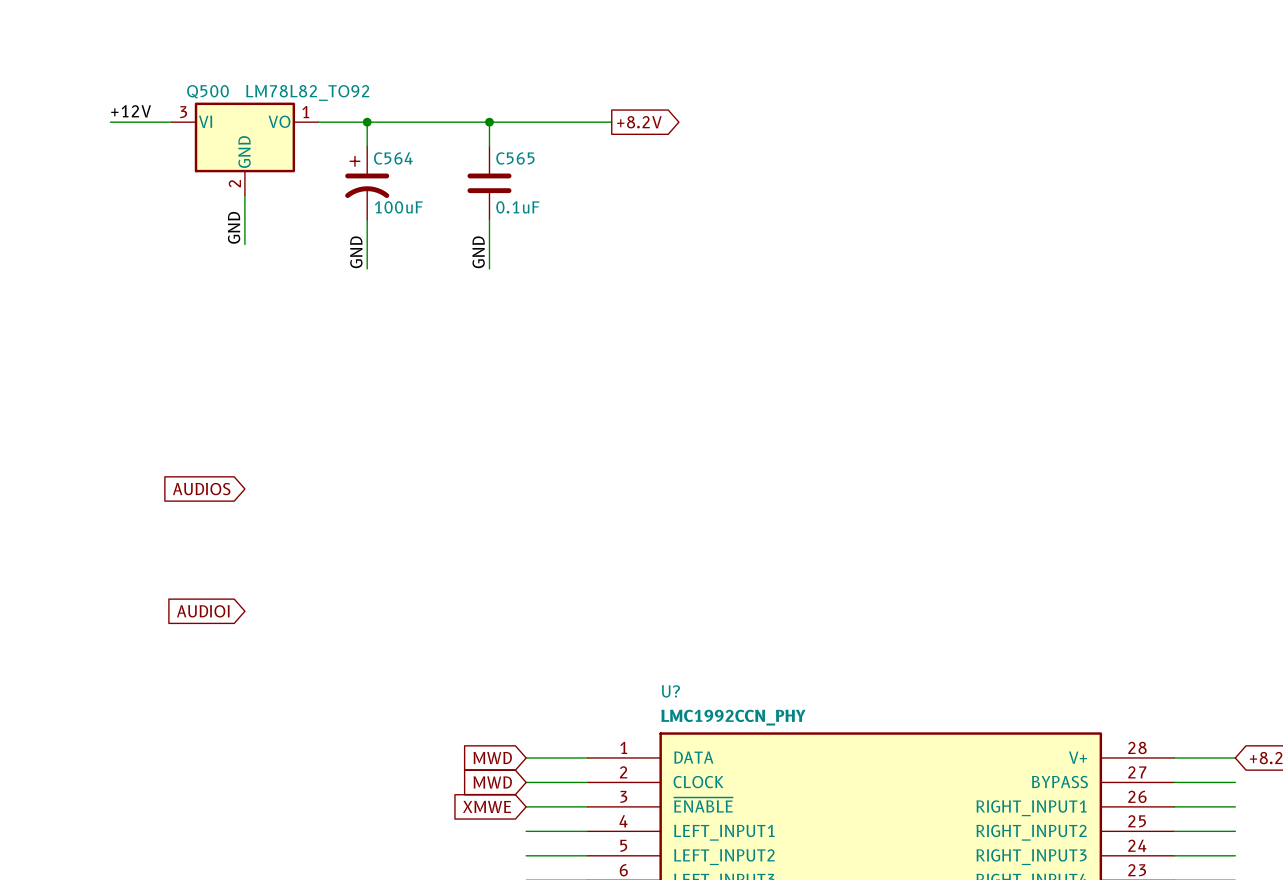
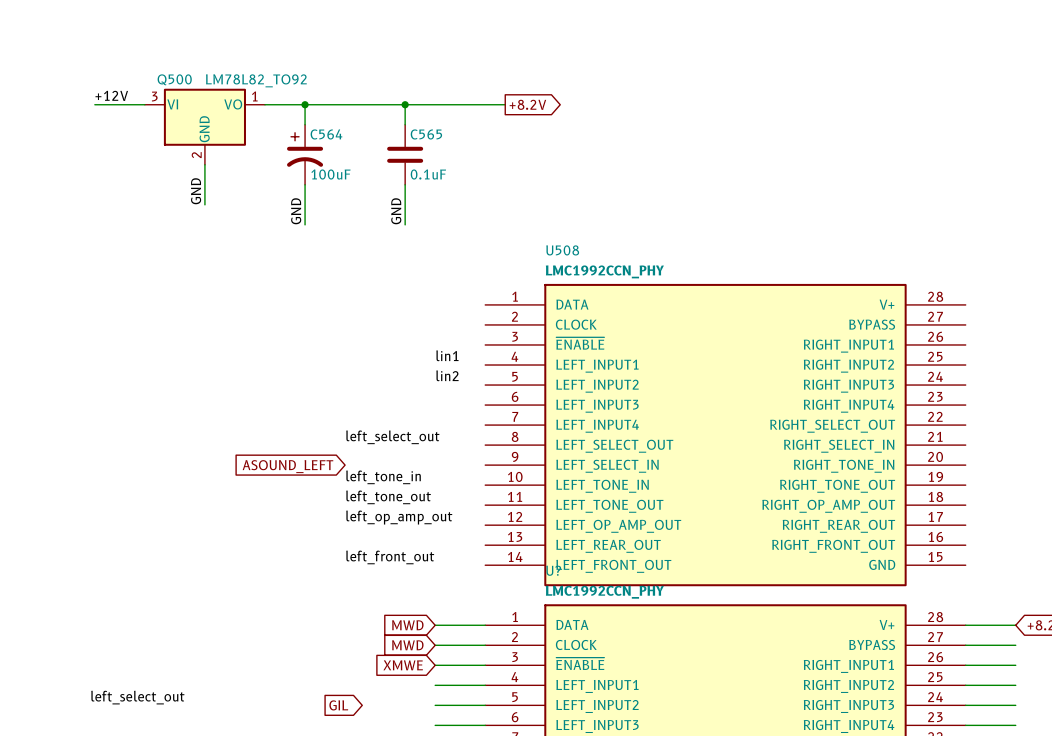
label: none -> lin1 (447, 355)
label: none -> lin2 (447, 375)
global label: AUDIOS (201, 489) -> none
U508: none -> LMC1992CCN_PHY (725, 435)
label: none -> left_select_out (392, 437)
global label: none -> ASOUND_LEFT (287, 466)
label: none -> left_tone_in (383, 477)
label: none -> left_tone_out (388, 497)
global label: AUDIOI (203, 611) -> none
label: none -> left_op_amp_out (399, 517)
label: none -> left_front_out (390, 557)
label: none -> left_select_out (137, 697)
global label: none -> GIL (338, 705)

